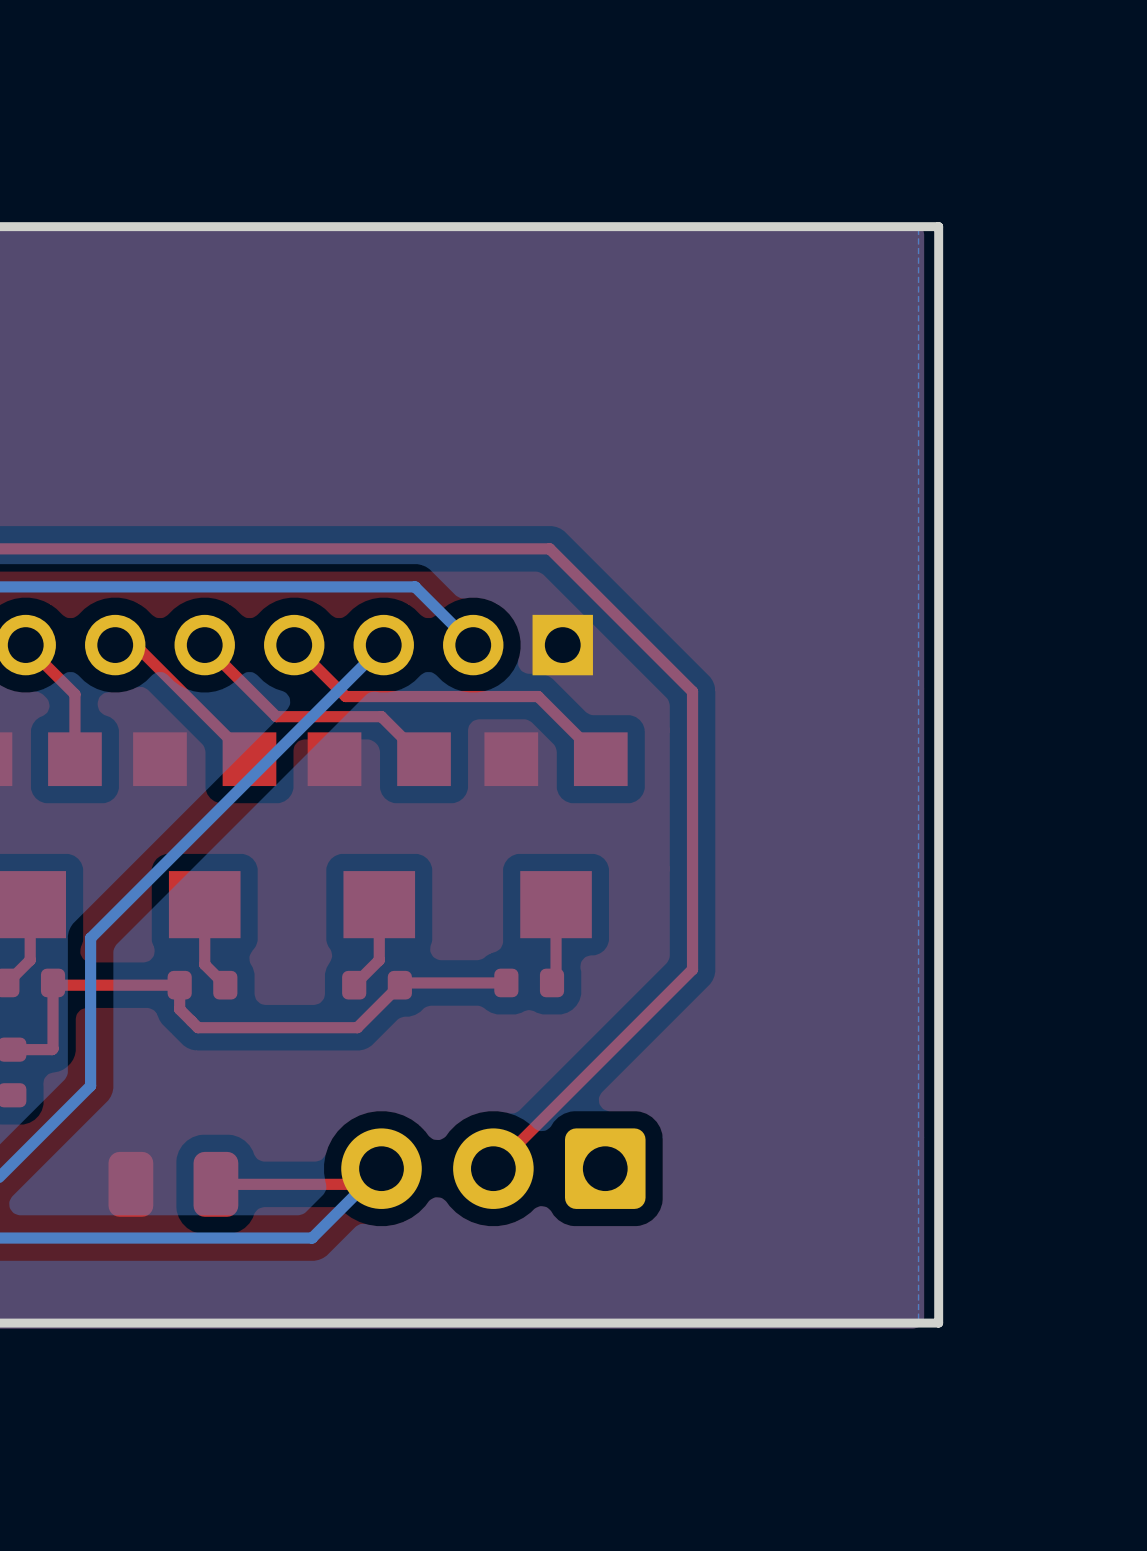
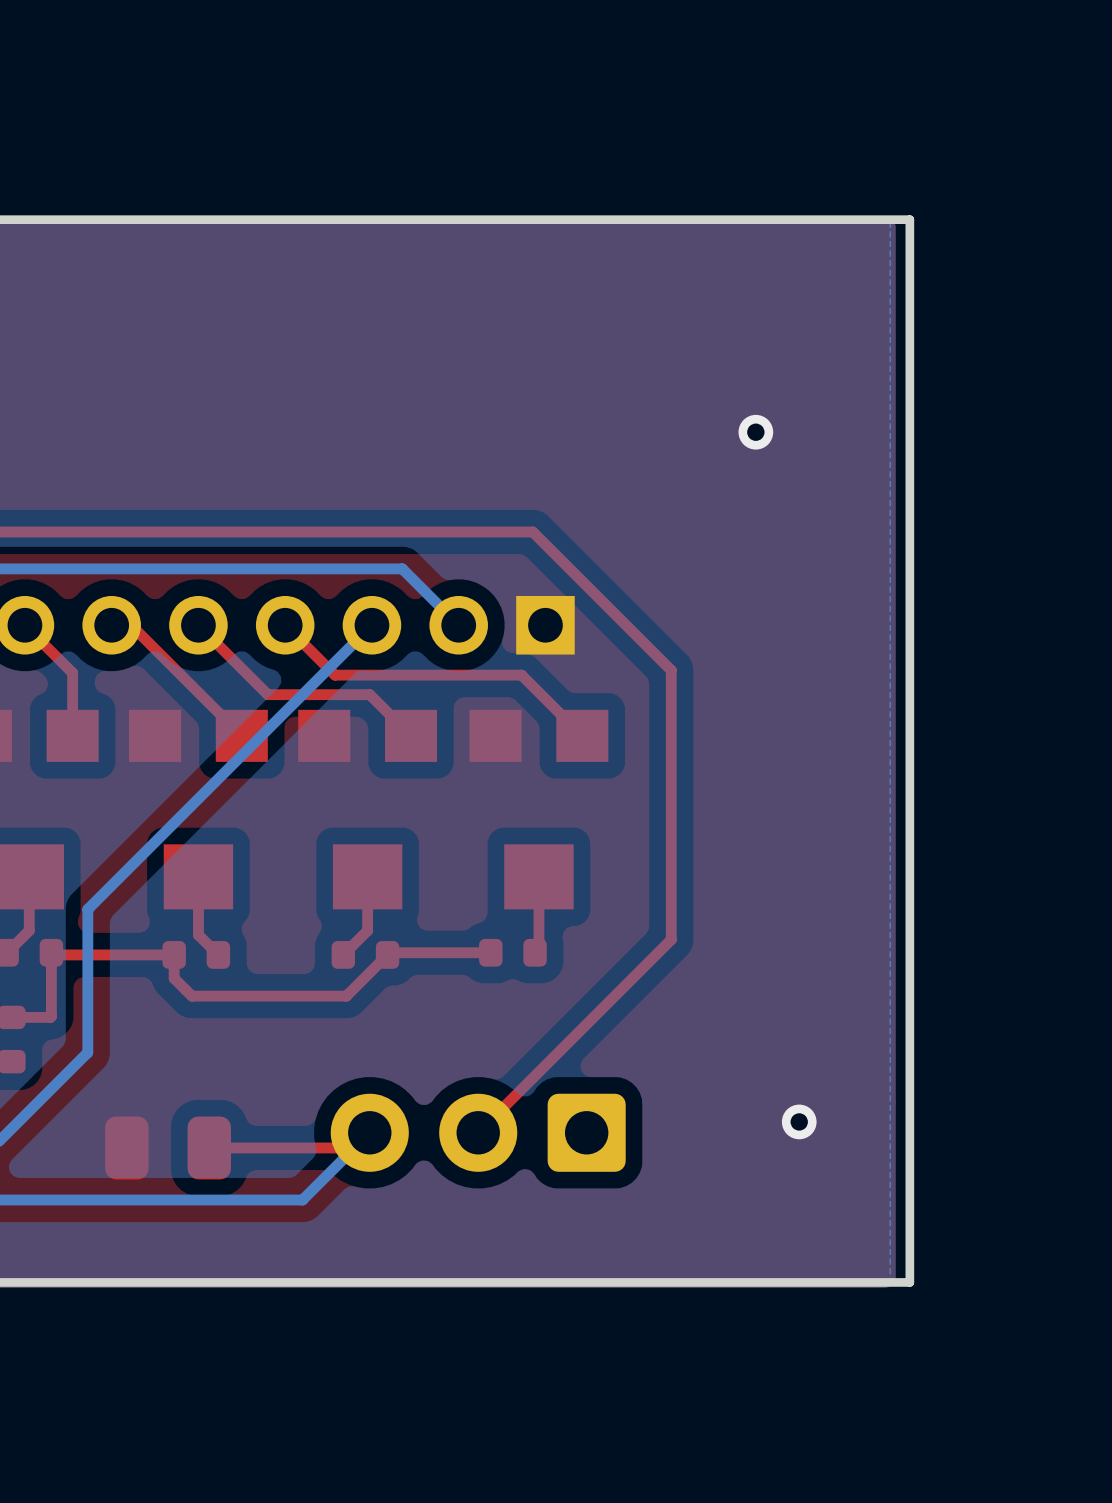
via: none -> (755, 432)
via: none -> (799, 1121)

